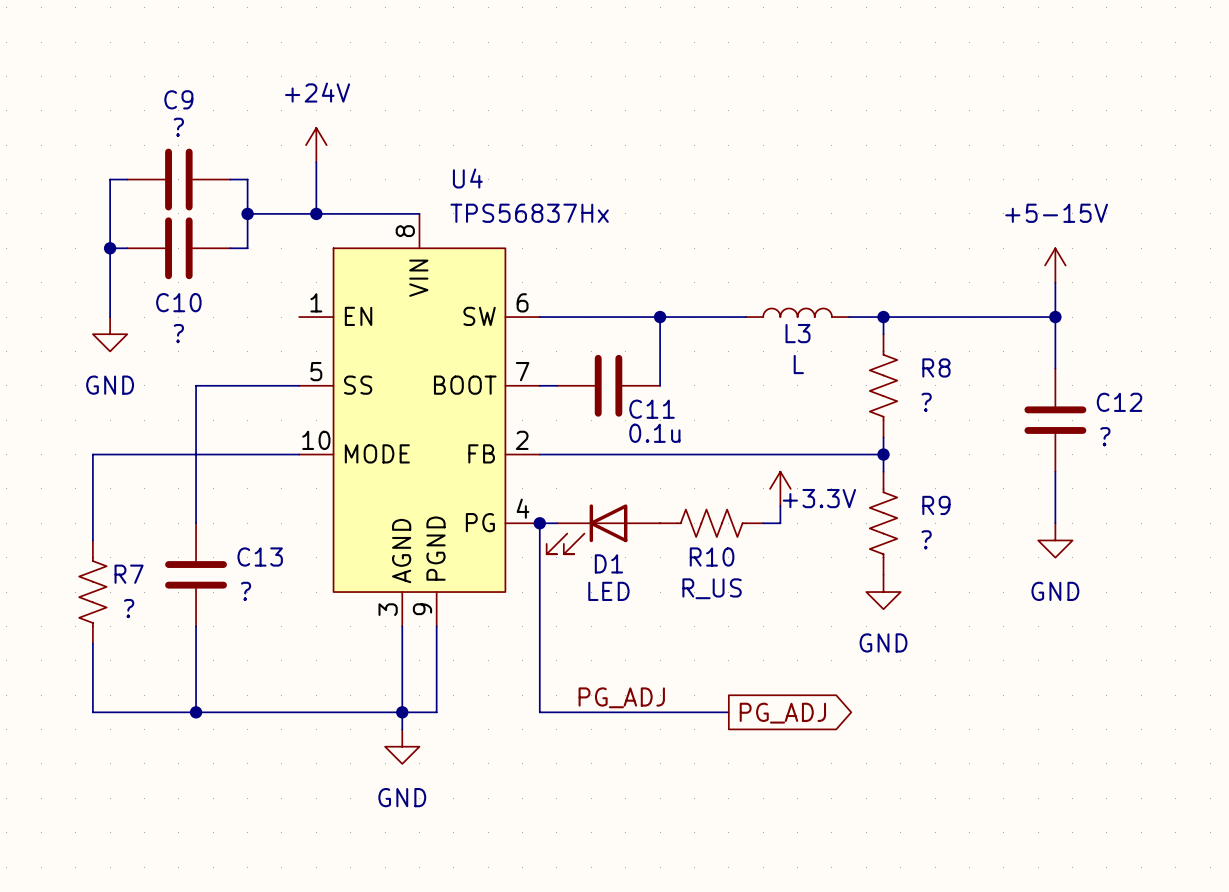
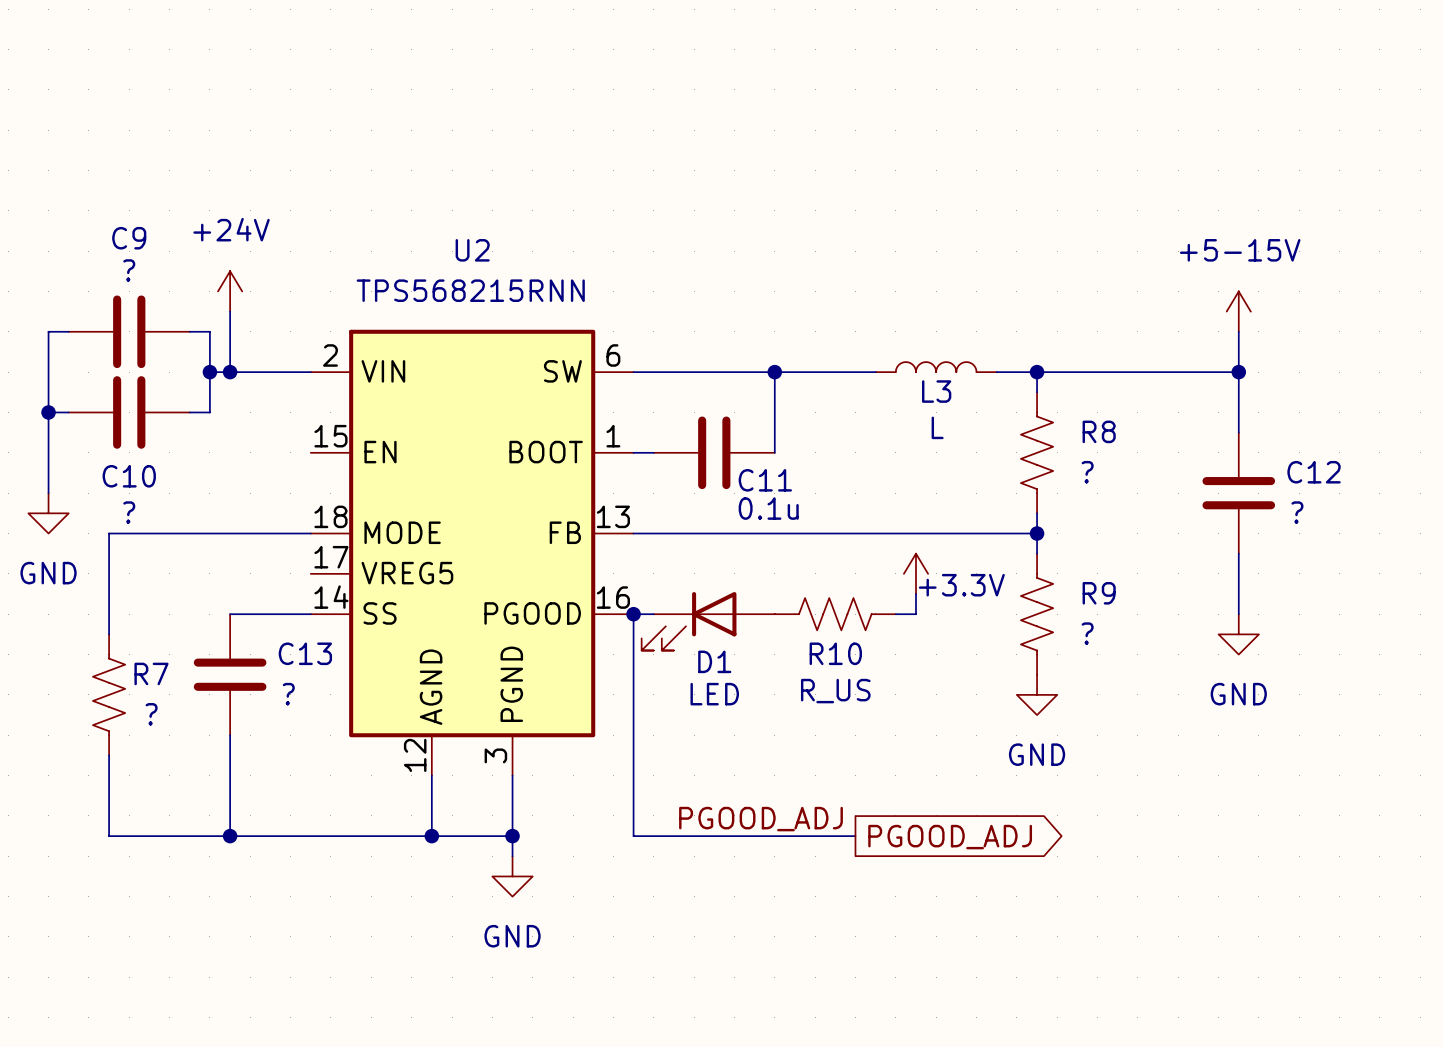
power symbol position: +24V (316, 145) -> +24V (230, 291)
wire: (316, 162) (316, 213) -> (230, 311) (230, 372)
wire: (127, 179) (110, 179) (110, 317) -> (68, 331) (48, 331) (48, 493)
C9 position: (178, 179) -> (129, 331)
wire: (230, 179) (247, 179) (247, 248) (230, 248) -> (189, 331) (209, 331) (209, 412) (189, 412)
wire: (247, 213) (419, 213) -> none
junction: (247, 213) -> none
junction: (316, 213) -> none
wire: (110, 248) (127, 248) -> (48, 412) (68, 412)
junction: (110, 248) -> none
C10 position: (178, 248) -> (129, 412)
wire: none -> (209, 372) (310, 372)
junction: none -> (209, 372)
junction: none -> (230, 372)
power symbol position: GND (110, 334) -> GND (48, 513)
junction: none -> (48, 412)
wire: (299, 385) (196, 385) (196, 523) -> (310, 614) (230, 614)
U4: TPS56837Hx (419, 420) -> none
U2: none -> TPS568215RNN (472, 552)
wire: (402, 626) (402, 729) -> none
wire: none -> (431, 775) (431, 836)
label: PG_ADJ (621, 697) -> PGOOD_ADJ (761, 819)
junction: none -> (431, 836)
junction: (402, 712) -> none
wire: none -> (512, 836) (512, 856)
junction: none -> (512, 836)
global label: PG_ADJ (782, 713) -> PGOOD_ADJ (950, 837)
power symbol position: GND (402, 746) -> GND (512, 876)

